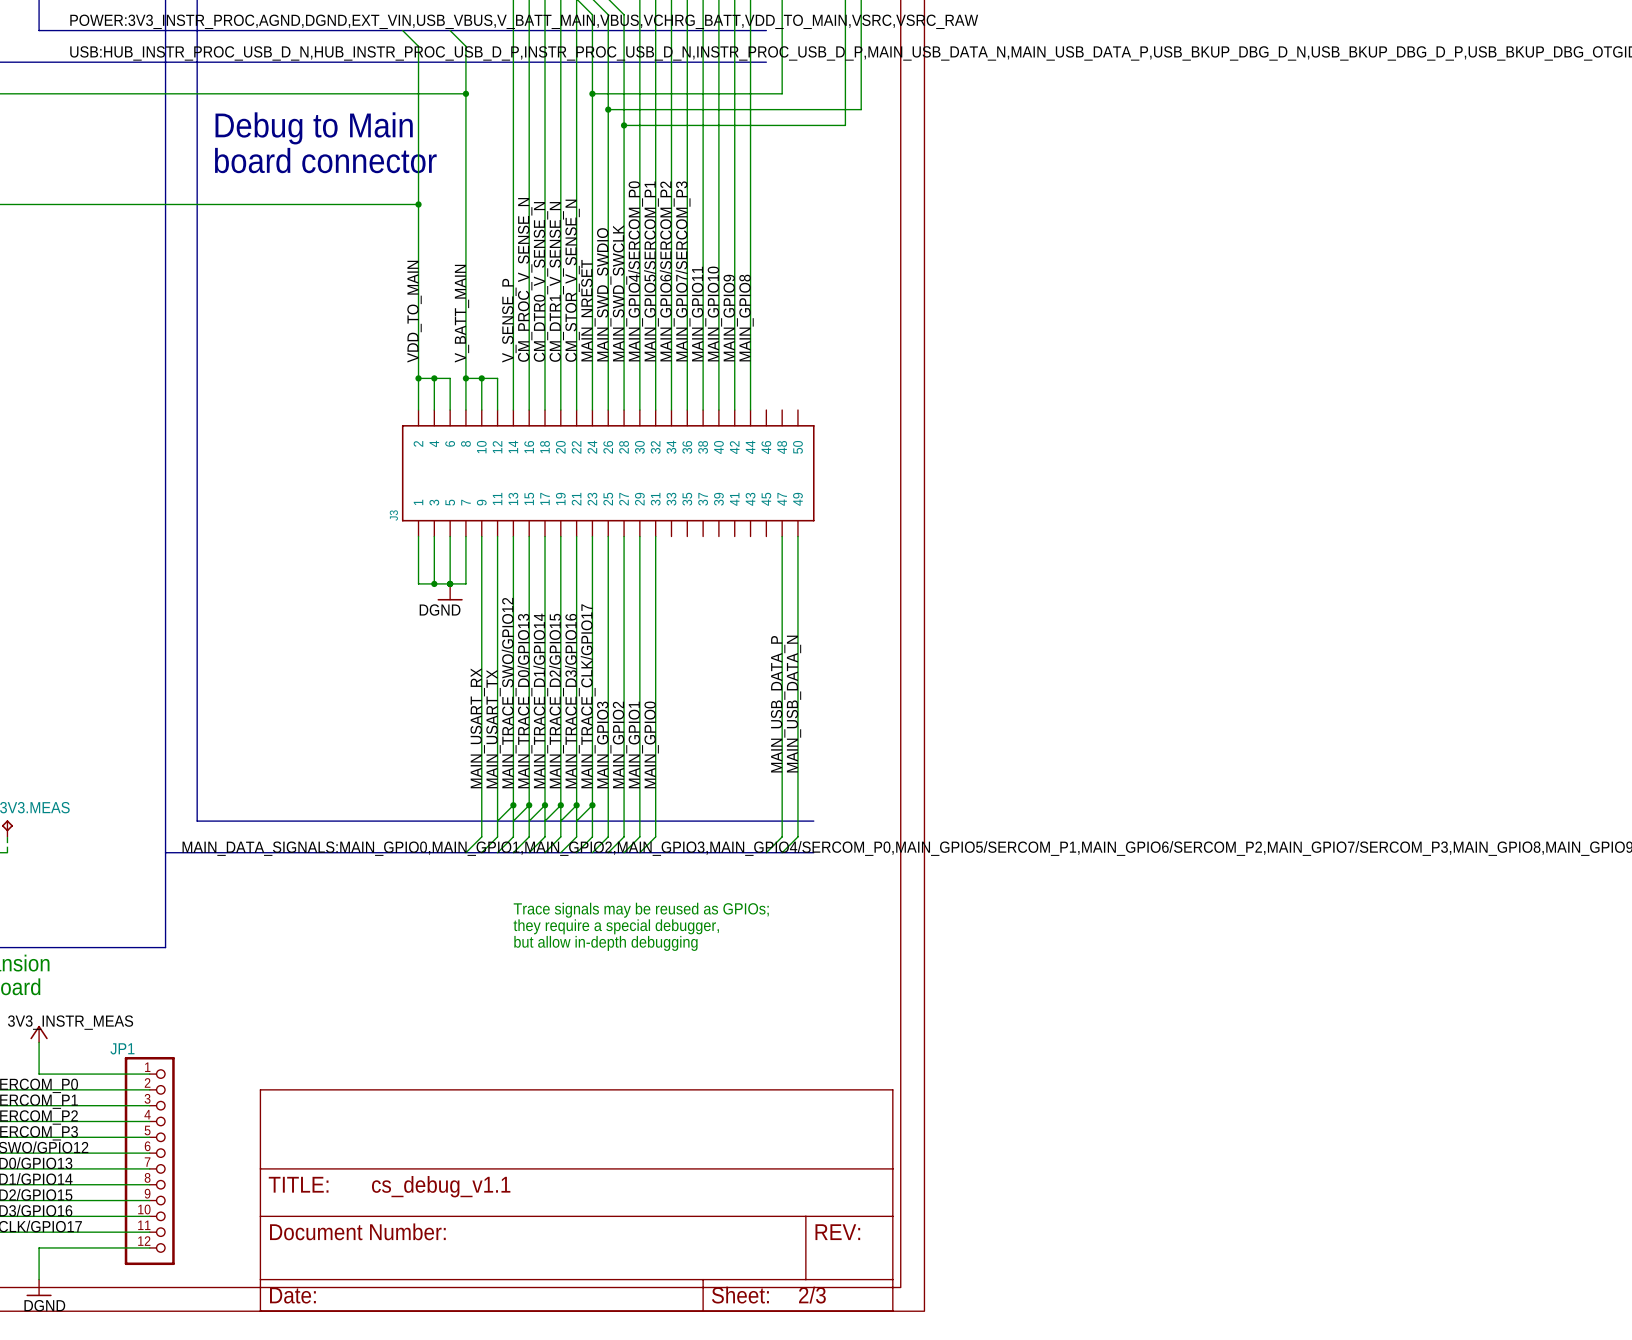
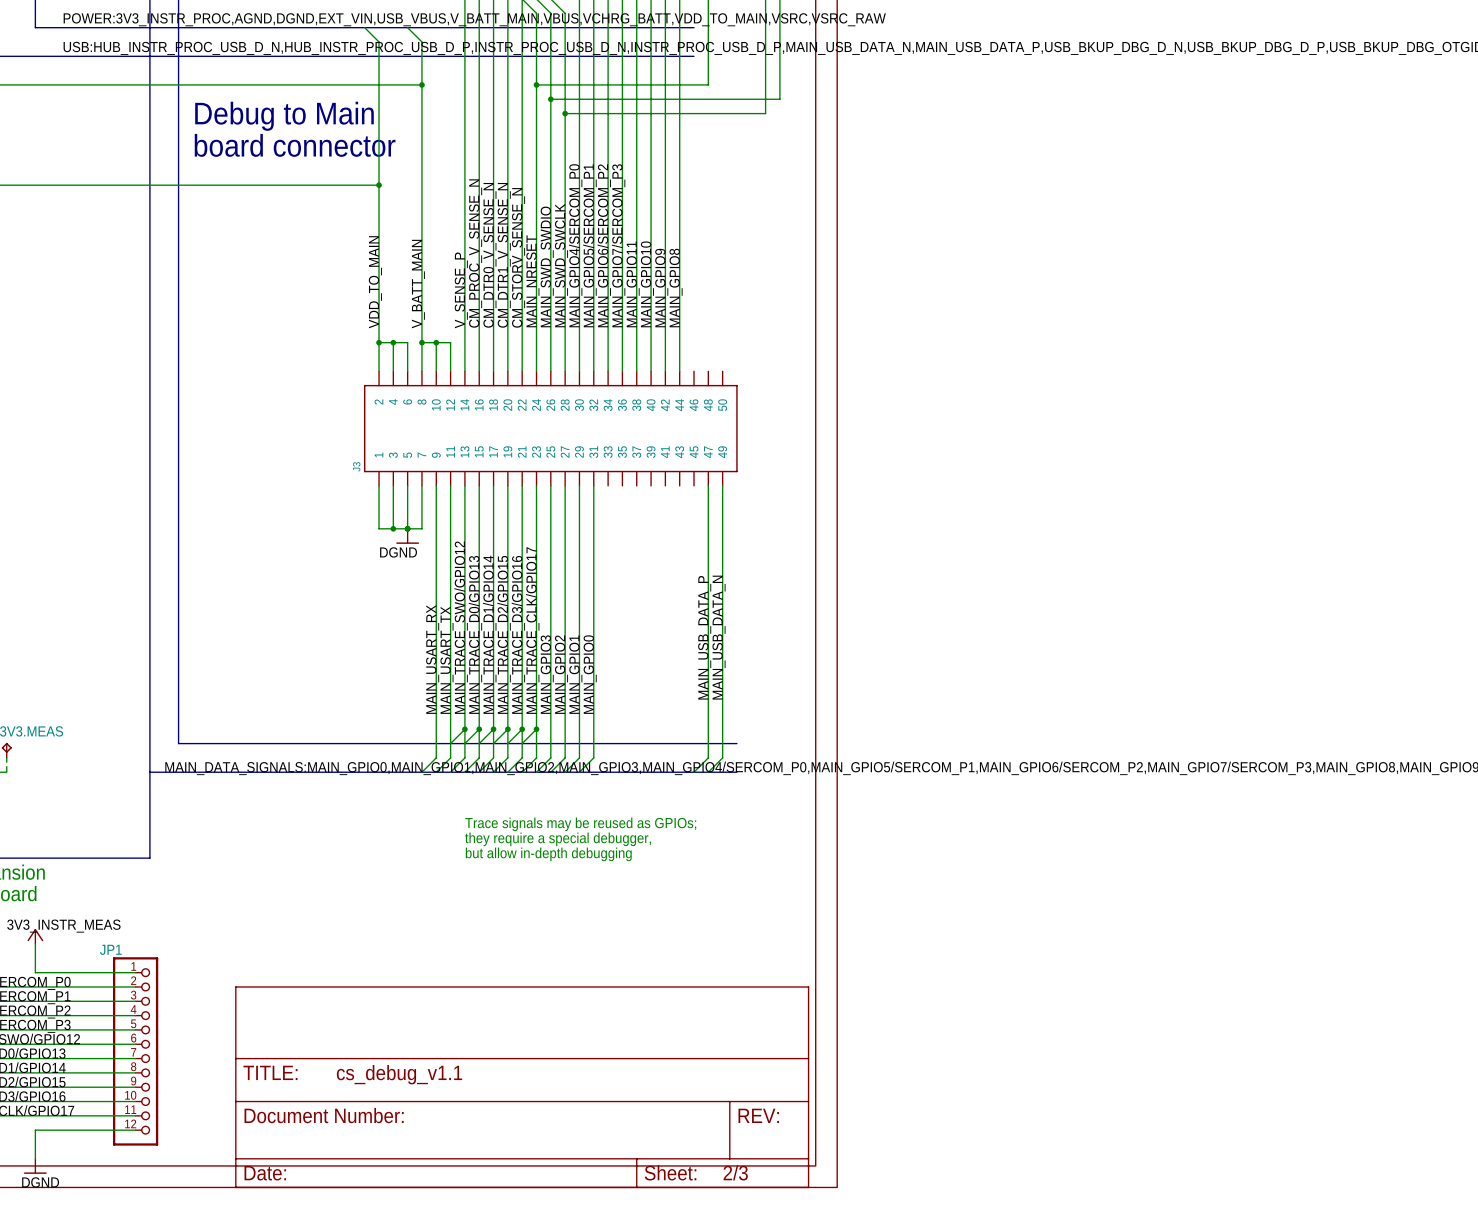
label: CM_STOR_V_SENSE_N (572, 280) -> CM_STORV_SENSE_N (518, 257)

